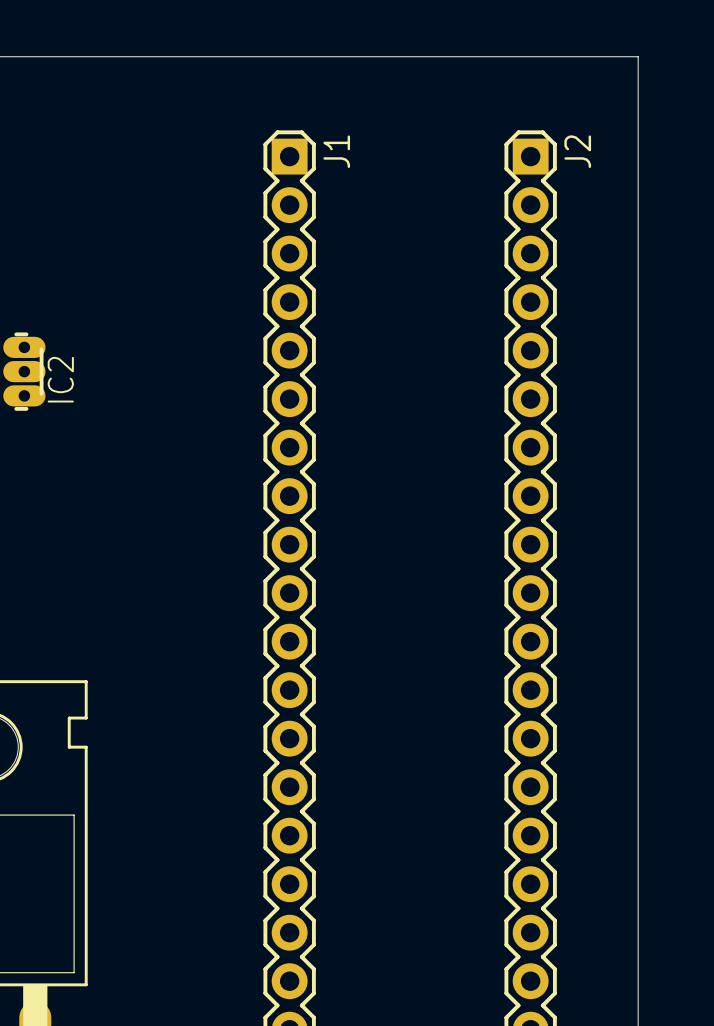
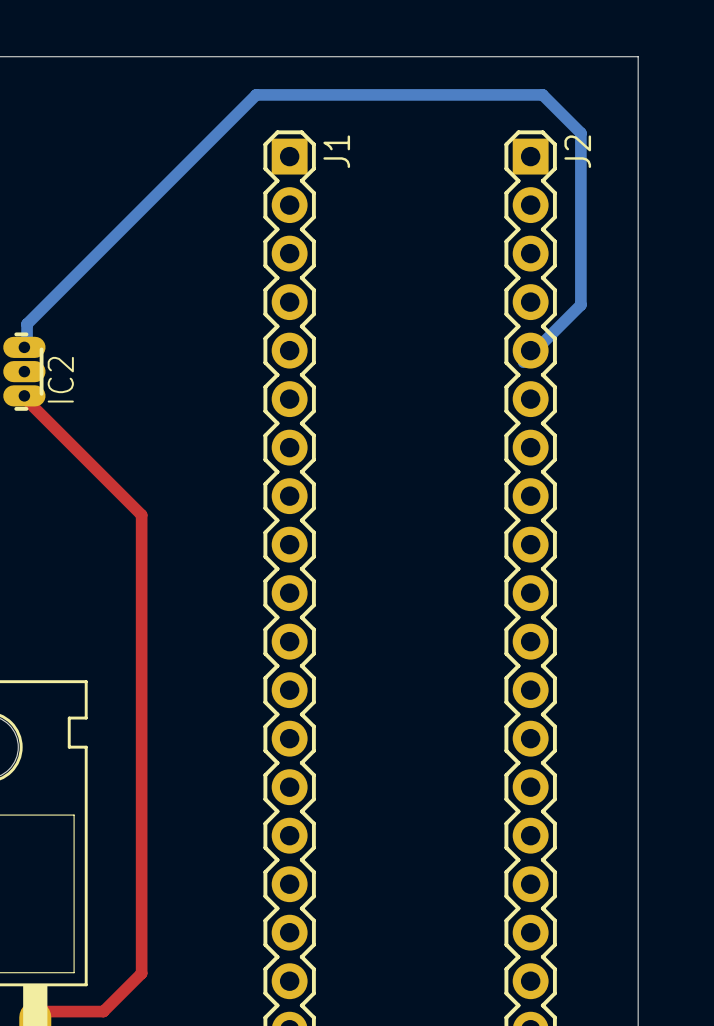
bottom track: none -> (27, 343) (27, 324) (256, 94) (542, 94) (580, 133) (580, 304) (523, 362)
top track: none -> (27, 400) (141, 515) (141, 973) (103, 1011) (27, 1011)

